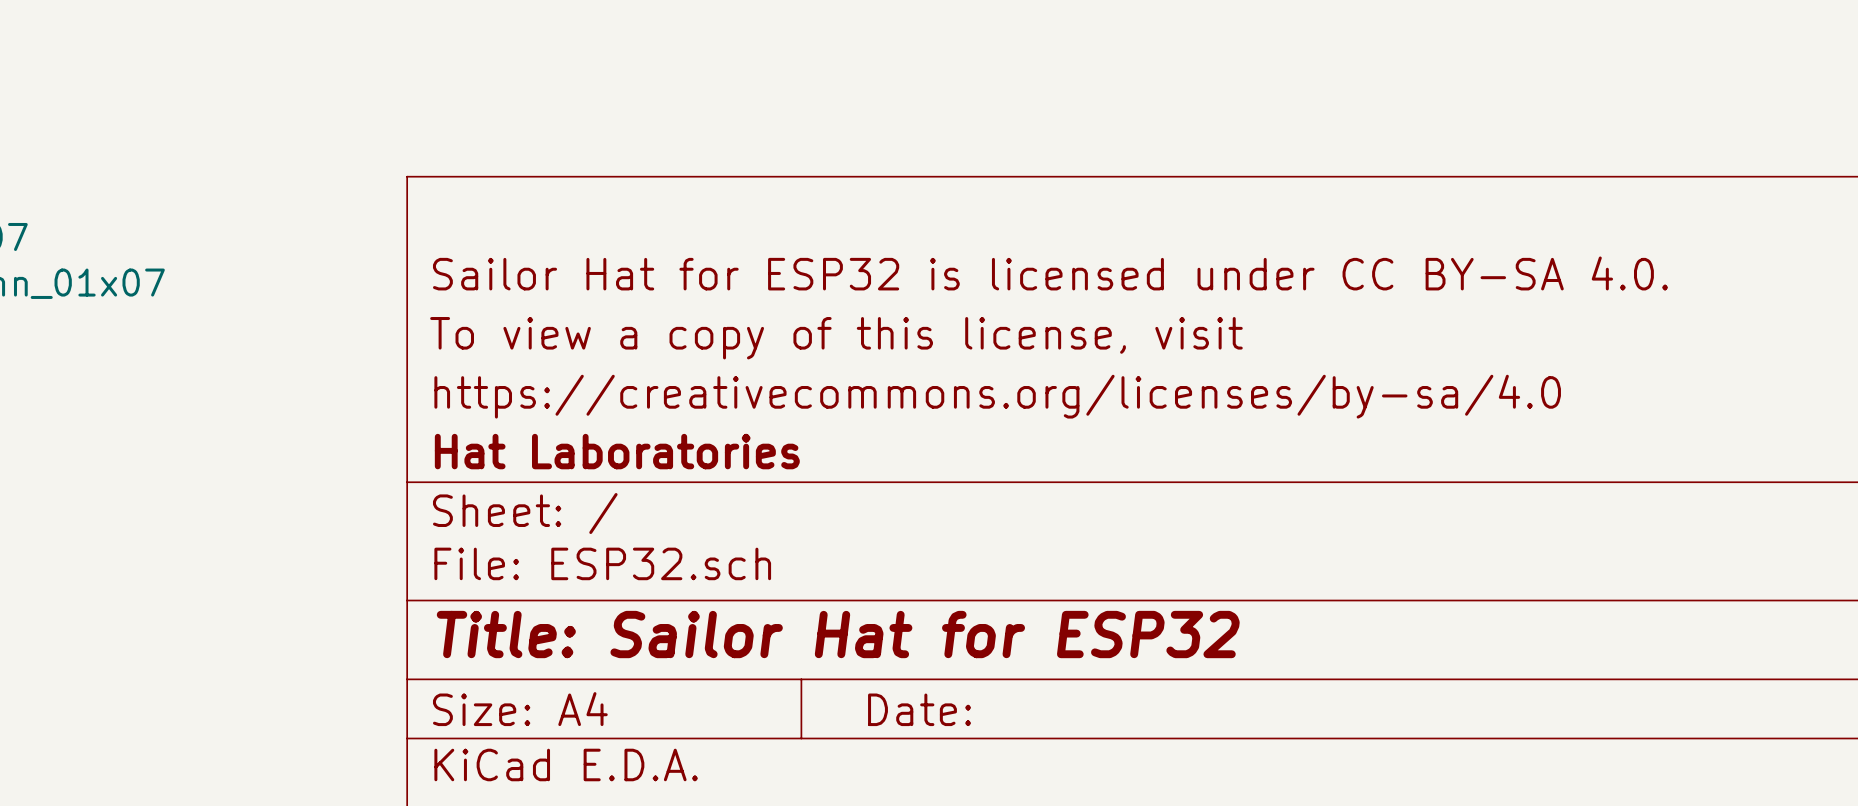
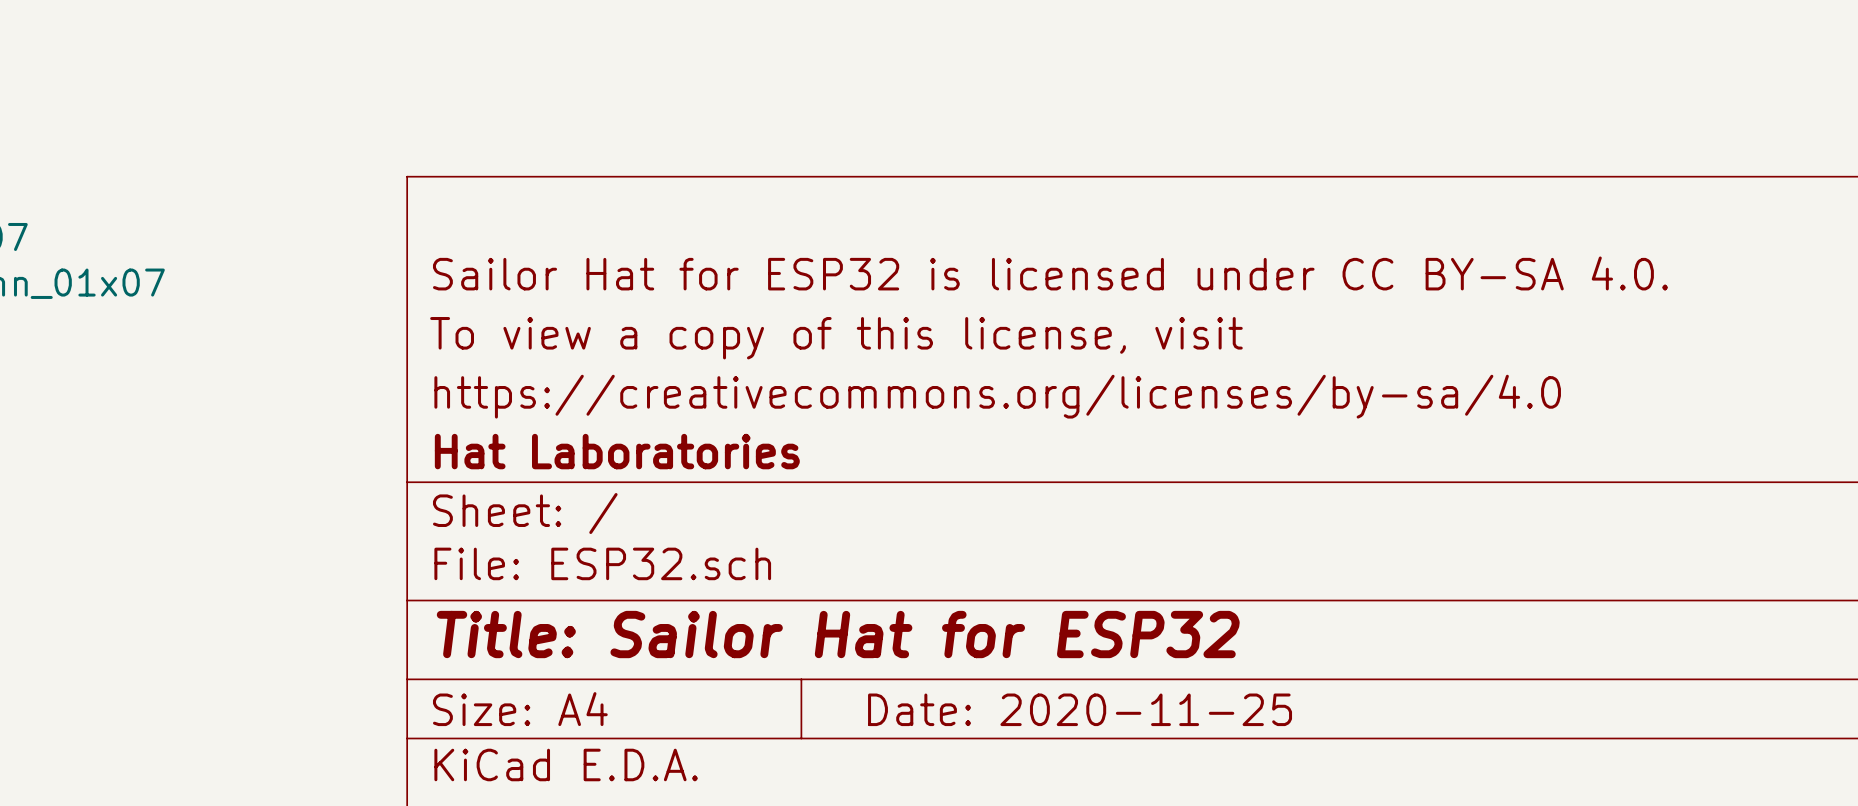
title block: Date: (919, 709) -> Date: 2020-11-25 (1080, 709)

